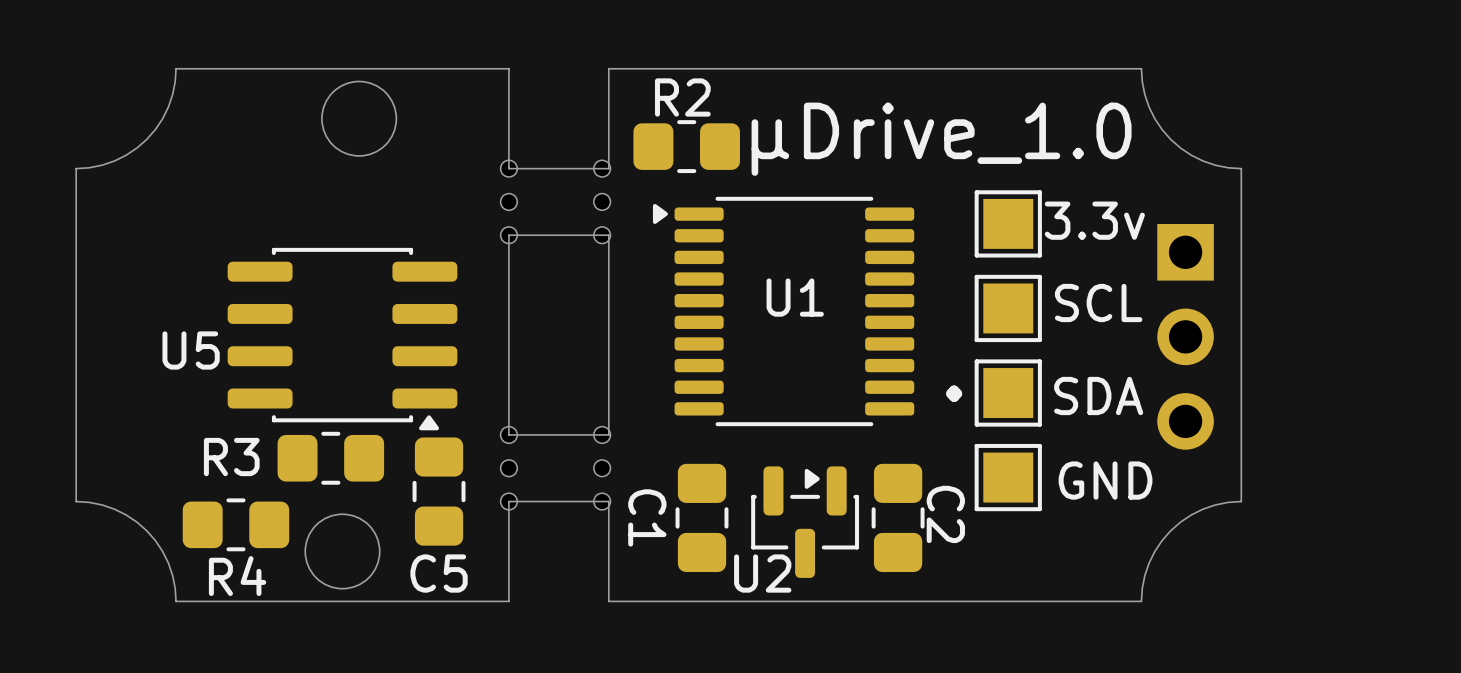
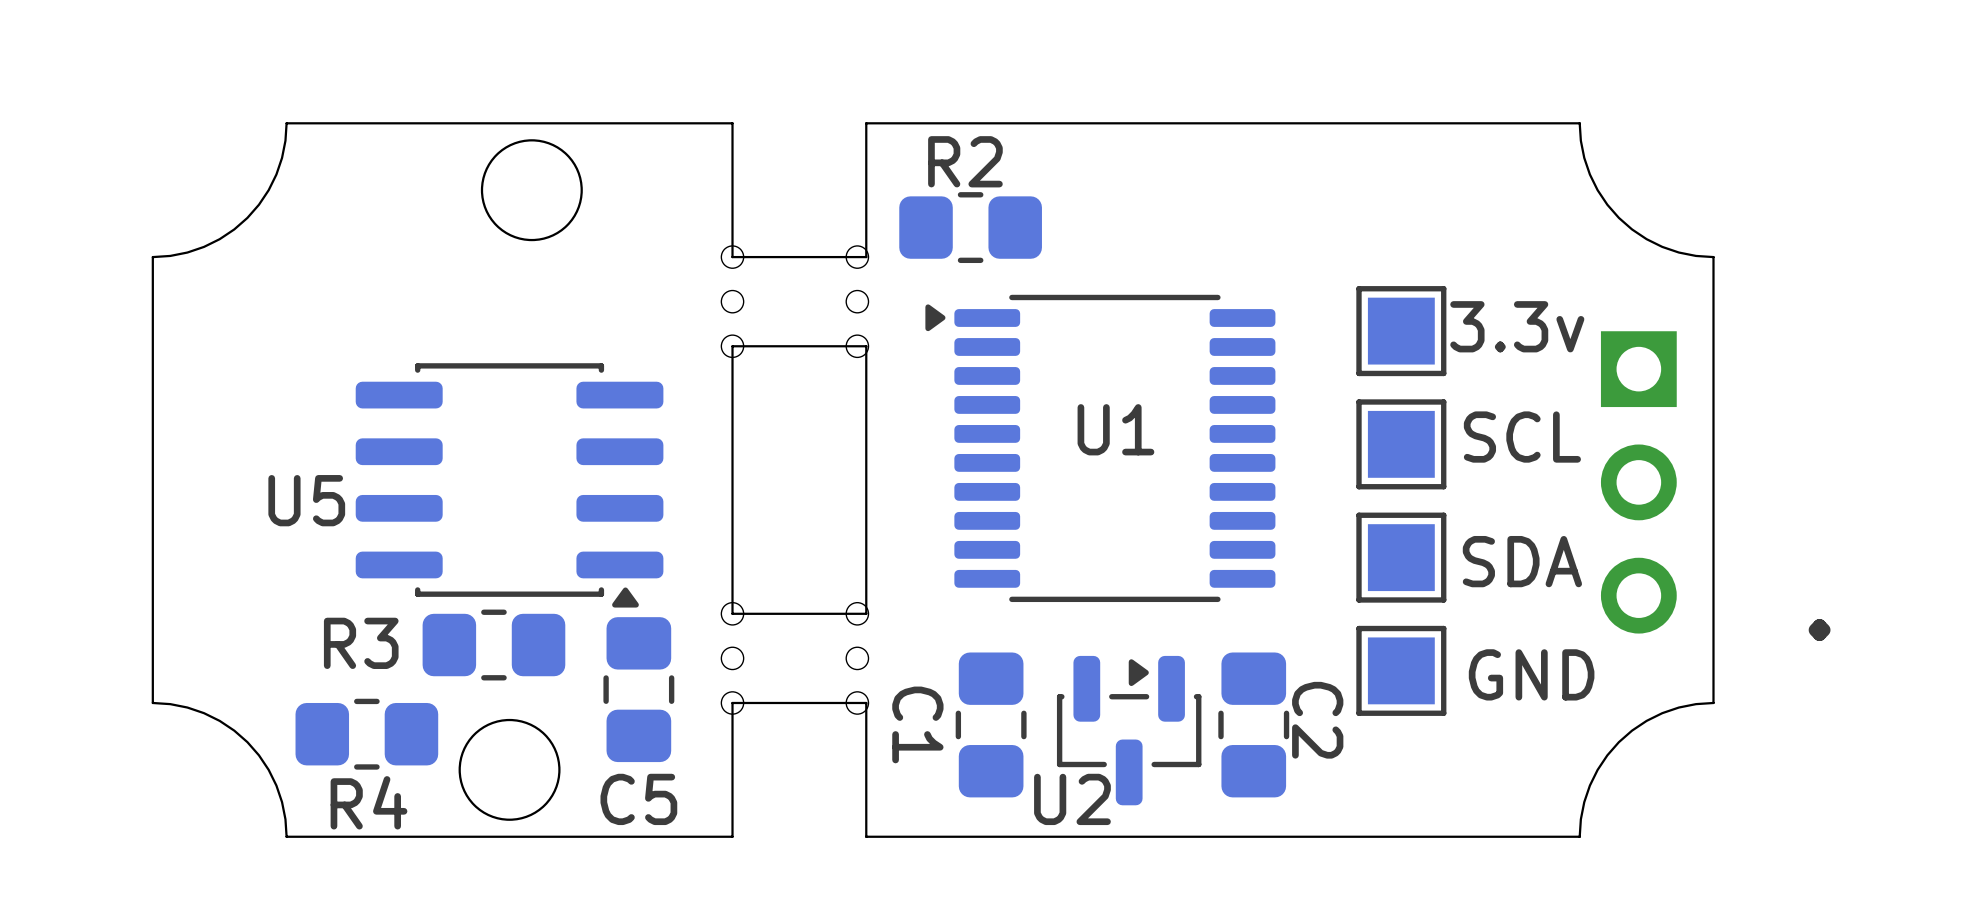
text: μDrive_1.0 (941, 139) -> none
text position: . (954, 393) -> . (1819, 630)

